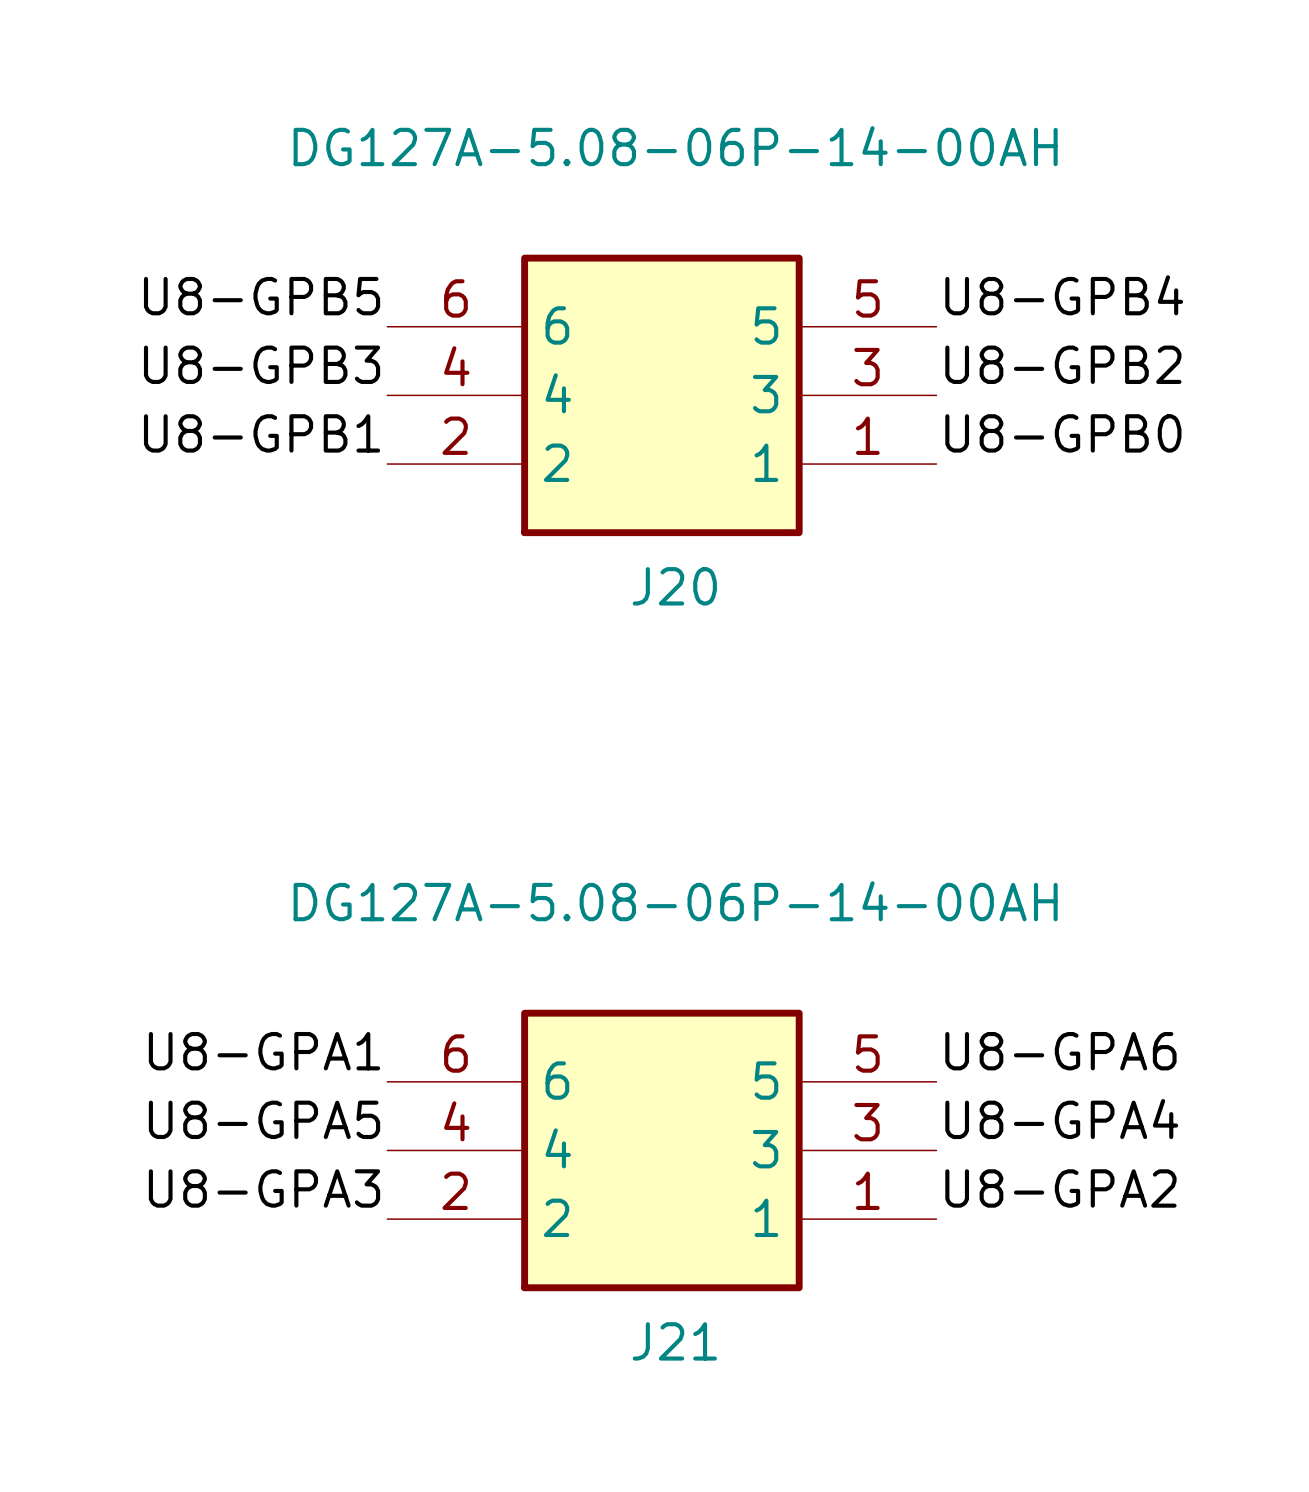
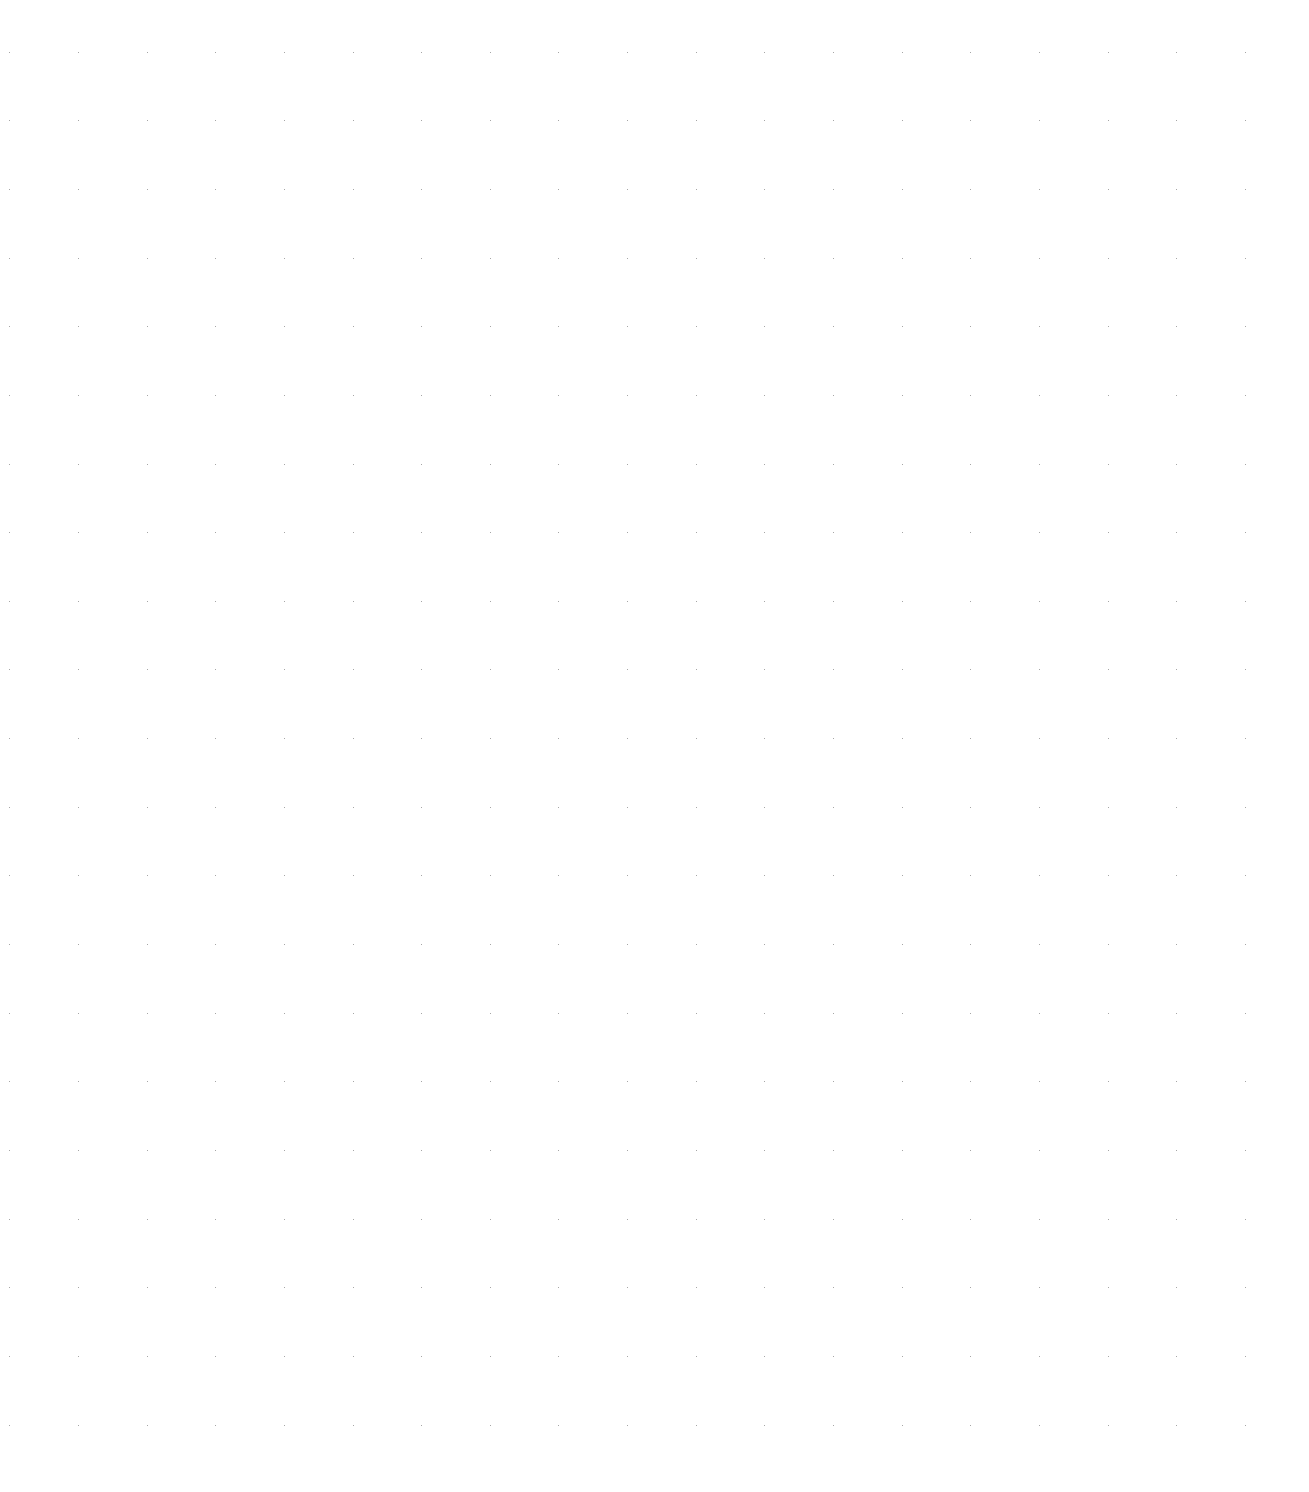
label: U8-GPB4 (1064, 295) -> none
label: U8-GPB5 (262, 296) -> none
label: U8-GPB3 (262, 364) -> none
label: U8-GPB2 (1063, 364) -> none
J20: DG127A-5.08-06P-14-00AH (661, 395) -> none
label: U8-GPB1 (262, 433) -> none
label: U8-GPB0 (1063, 433) -> none
label: U8-GPA1 (264, 1051) -> none
label: U8-GPA6 (1060, 1051) -> none
label: U8-GPA5 (264, 1119) -> none
label: U8-GPA4 (1061, 1119) -> none
J21: DG127A-5.08-06P-14-00AH (661, 1150) -> none
label: U8-GPA3 (264, 1188) -> none
label: U8-GPA2 (1060, 1188) -> none

